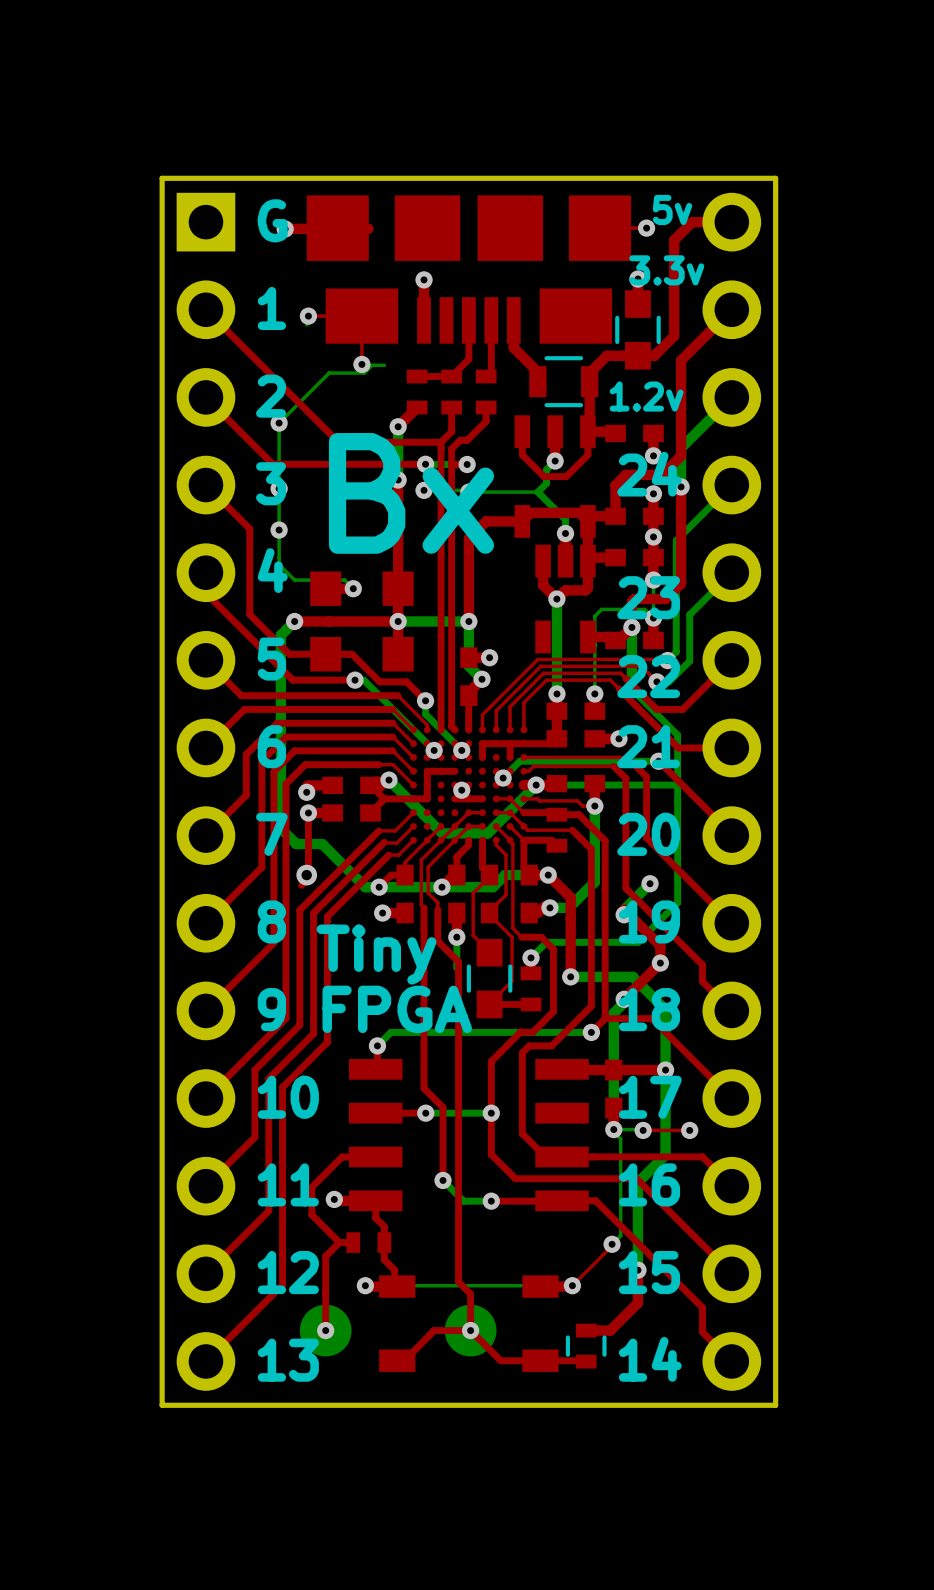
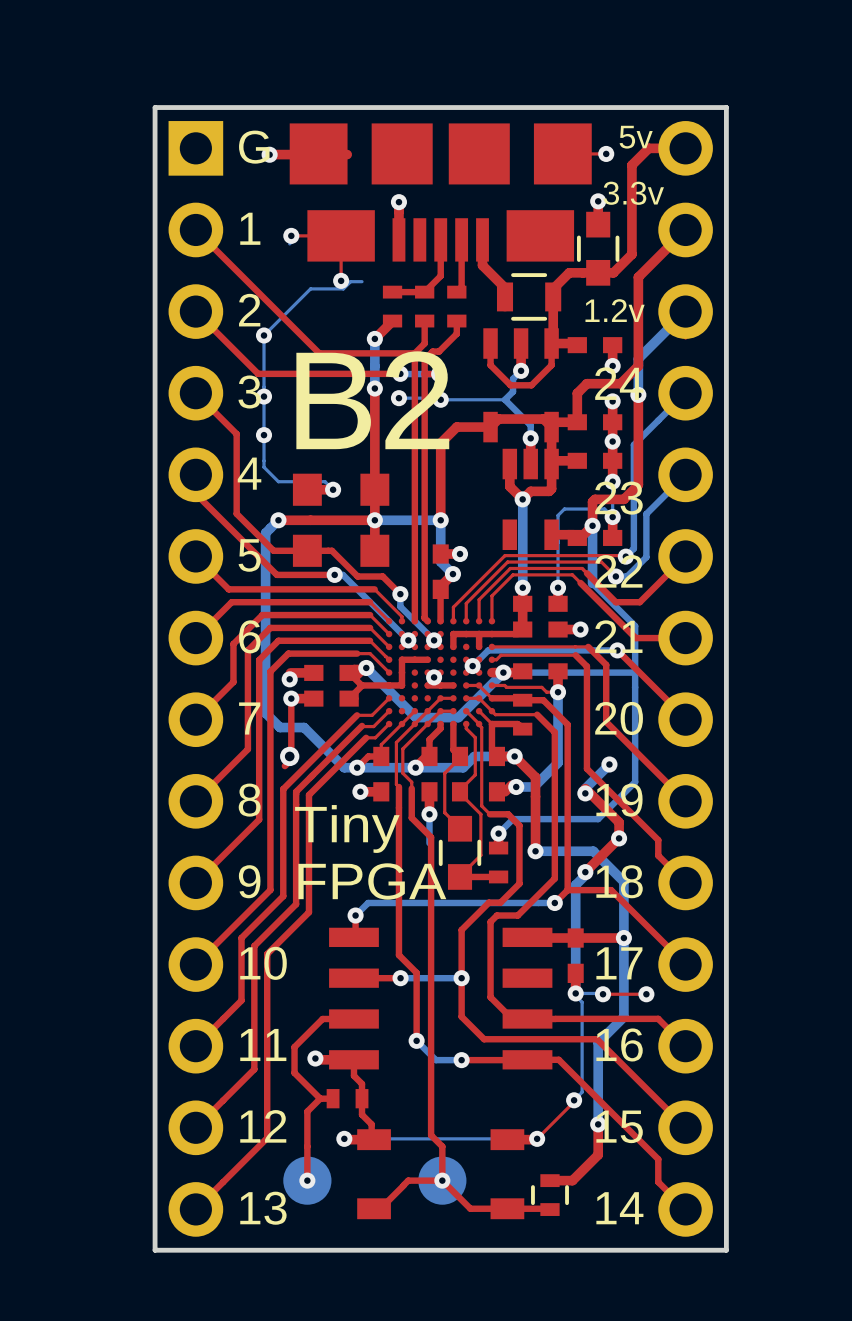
text: Bx (411, 493) -> B2 (372, 400)

